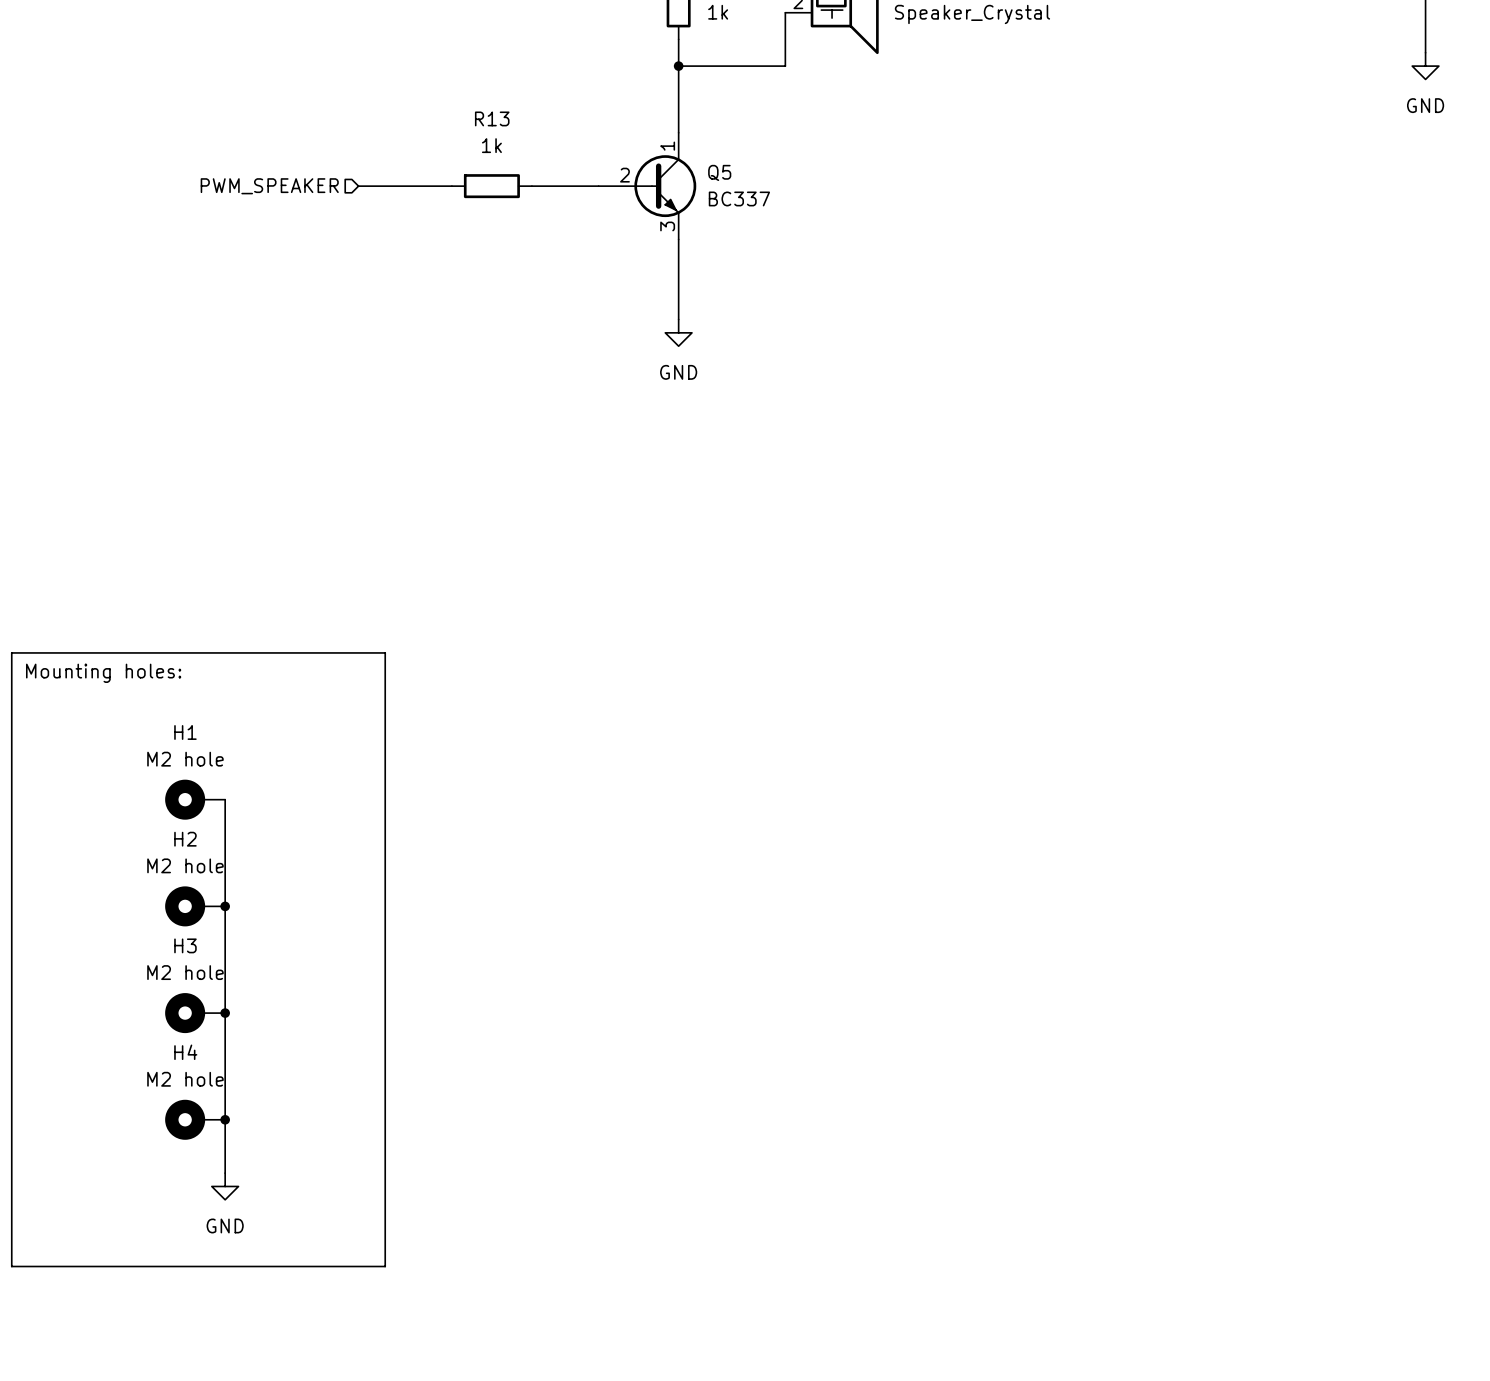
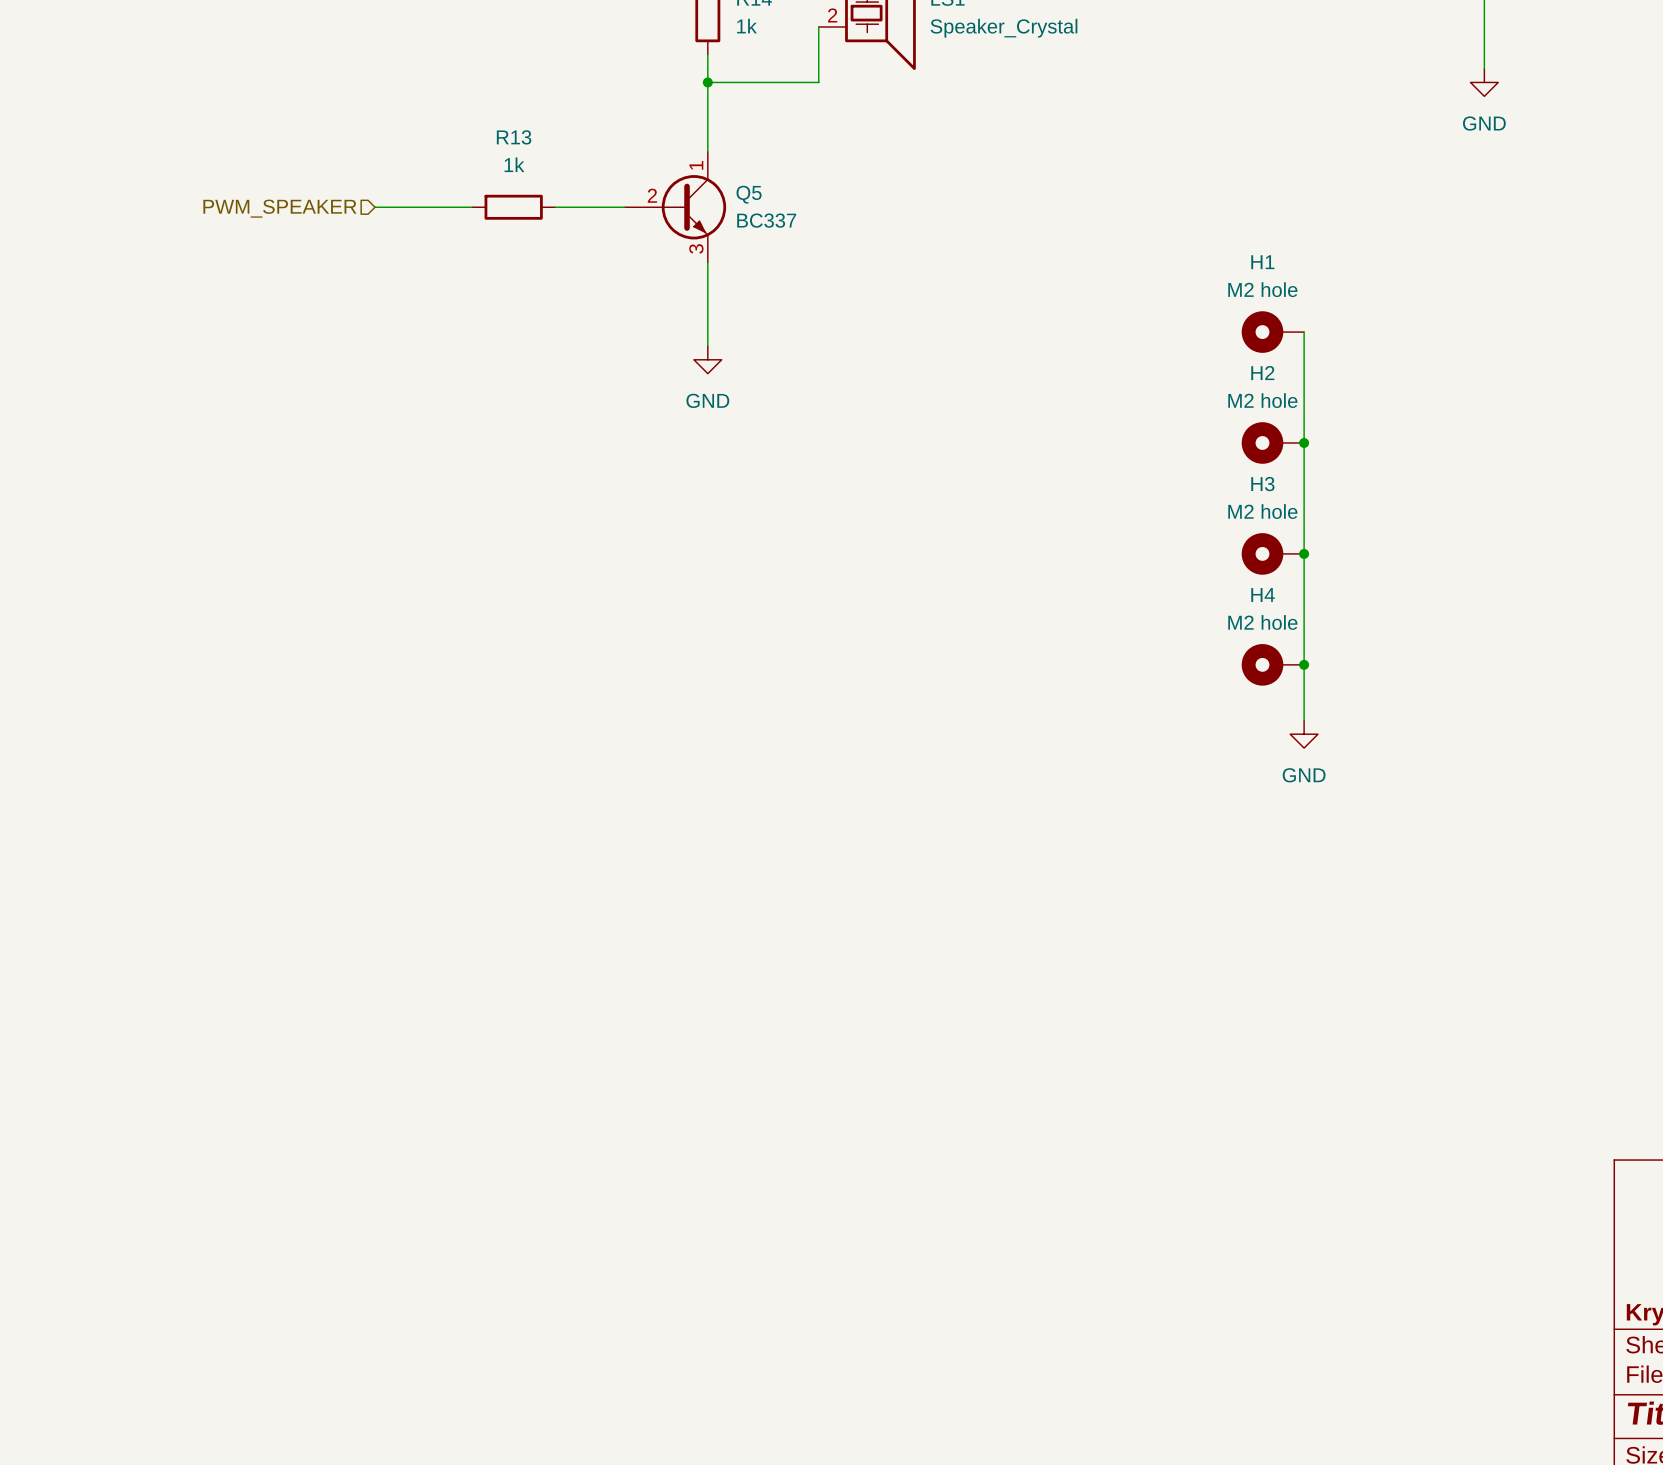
wire: none -> (1304, 332) (1304, 720)
junction: none -> (1304, 442)
junction: none -> (1304, 553)
junction: none -> (1304, 664)
line: (11, 652) (385, 652) (385, 1266) (11, 1266) (11, 652) -> none
text: Mounting holes: (103, 673) -> none
power symbol: none -> GND (1304, 734)
H1 position: (195, 799) -> (1272, 332)
wire: (225, 799) (225, 1173) -> none
H2 position: (195, 906) -> (1272, 442)
junction: (225, 906) -> none
H3 position: (195, 1013) -> (1272, 553)
junction: (225, 1013) -> none
H4 position: (195, 1119) -> (1272, 664)
junction: (225, 1119) -> none
power symbol: GND (225, 1186) -> none

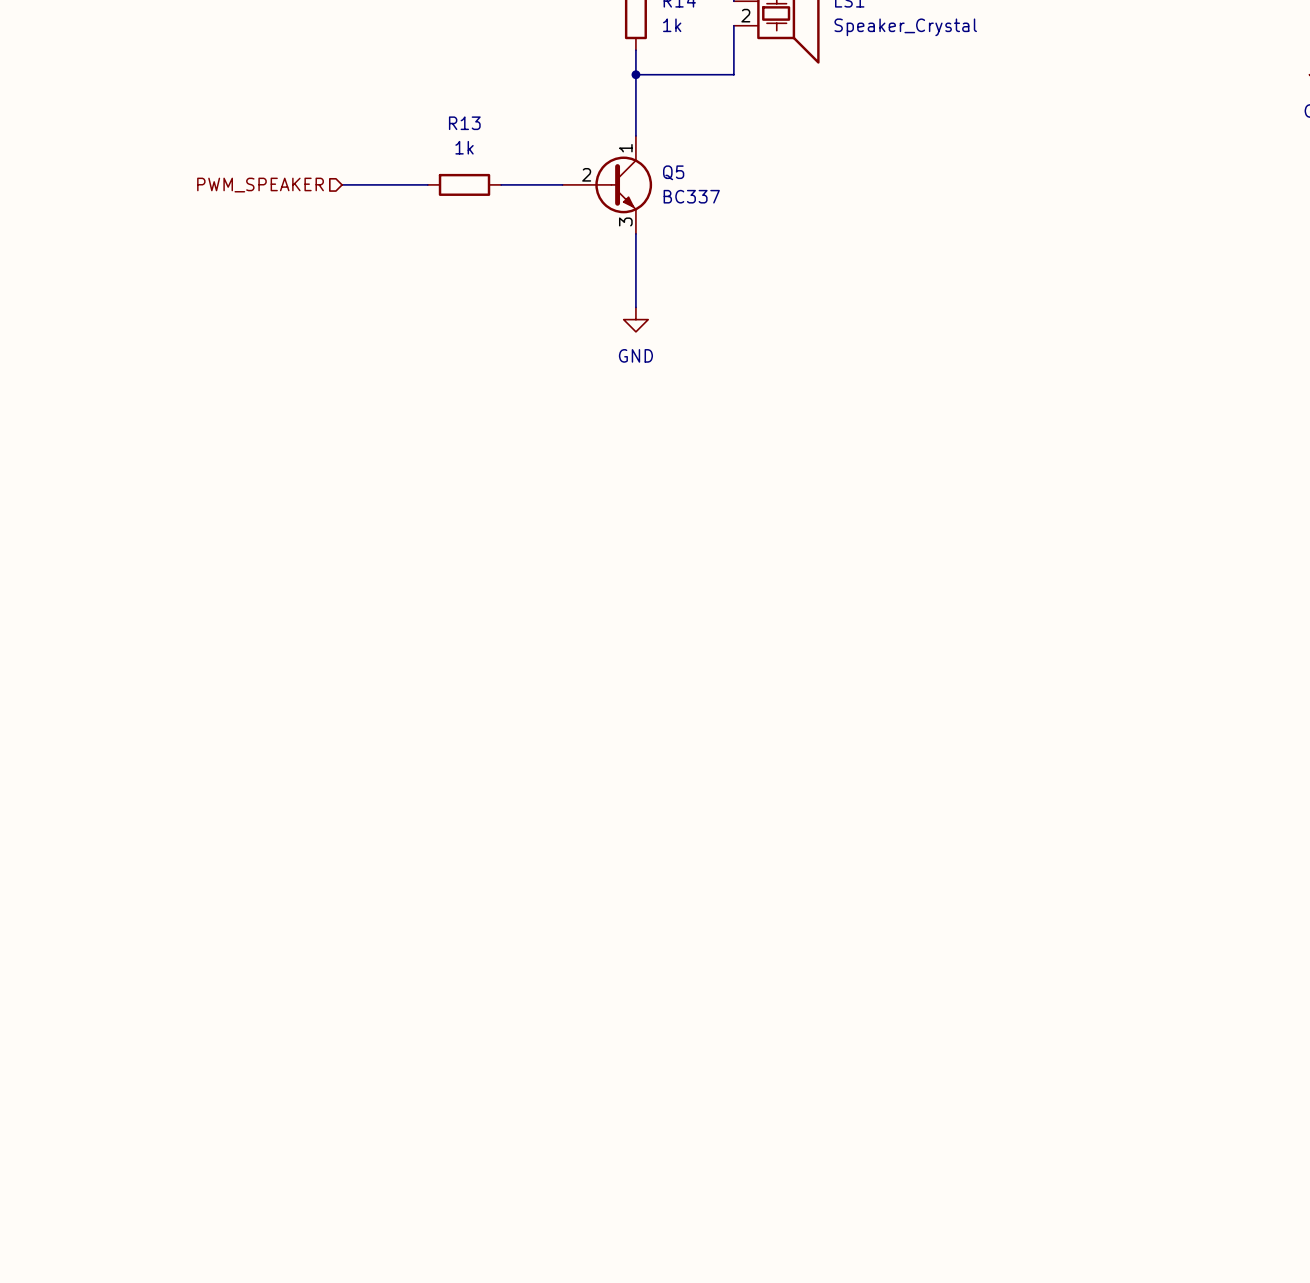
H1: M2 hole (1272, 332) -> none
wire: (1304, 332) (1304, 720) -> none
H2: M2 hole (1272, 442) -> none
junction: (1304, 442) -> none
H3: M2 hole (1272, 553) -> none
junction: (1304, 553) -> none
H4: M2 hole (1272, 664) -> none
junction: (1304, 664) -> none
power symbol: GND (1304, 734) -> none

